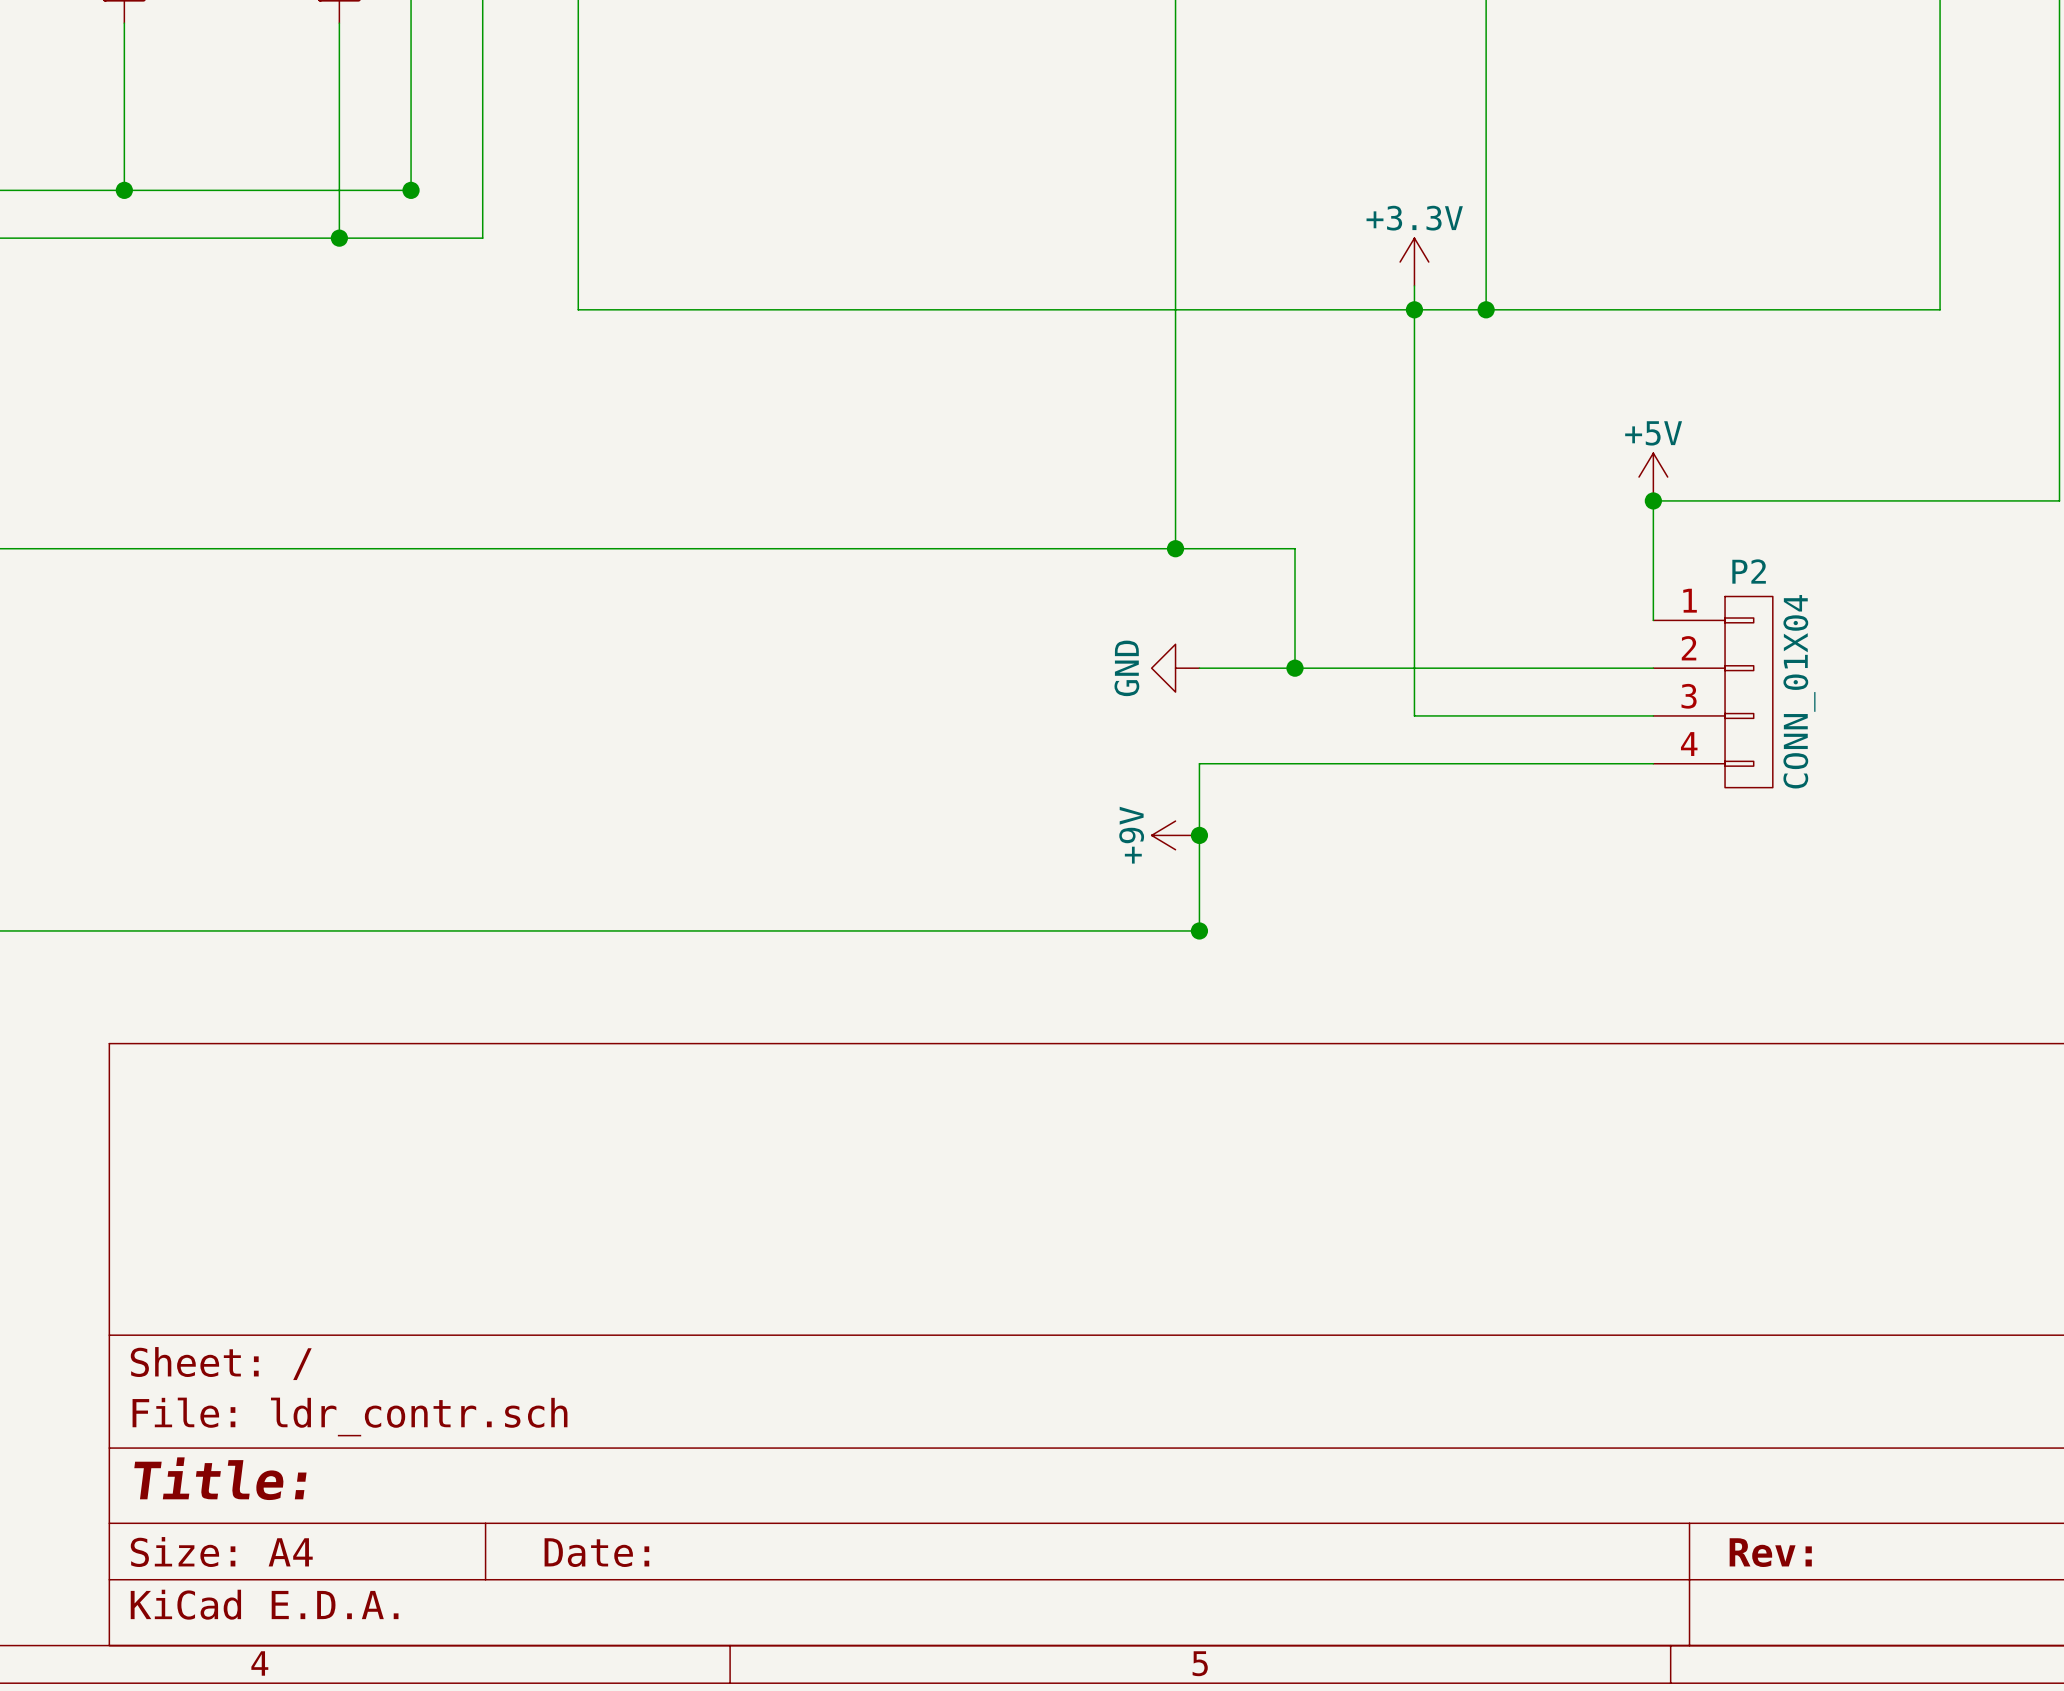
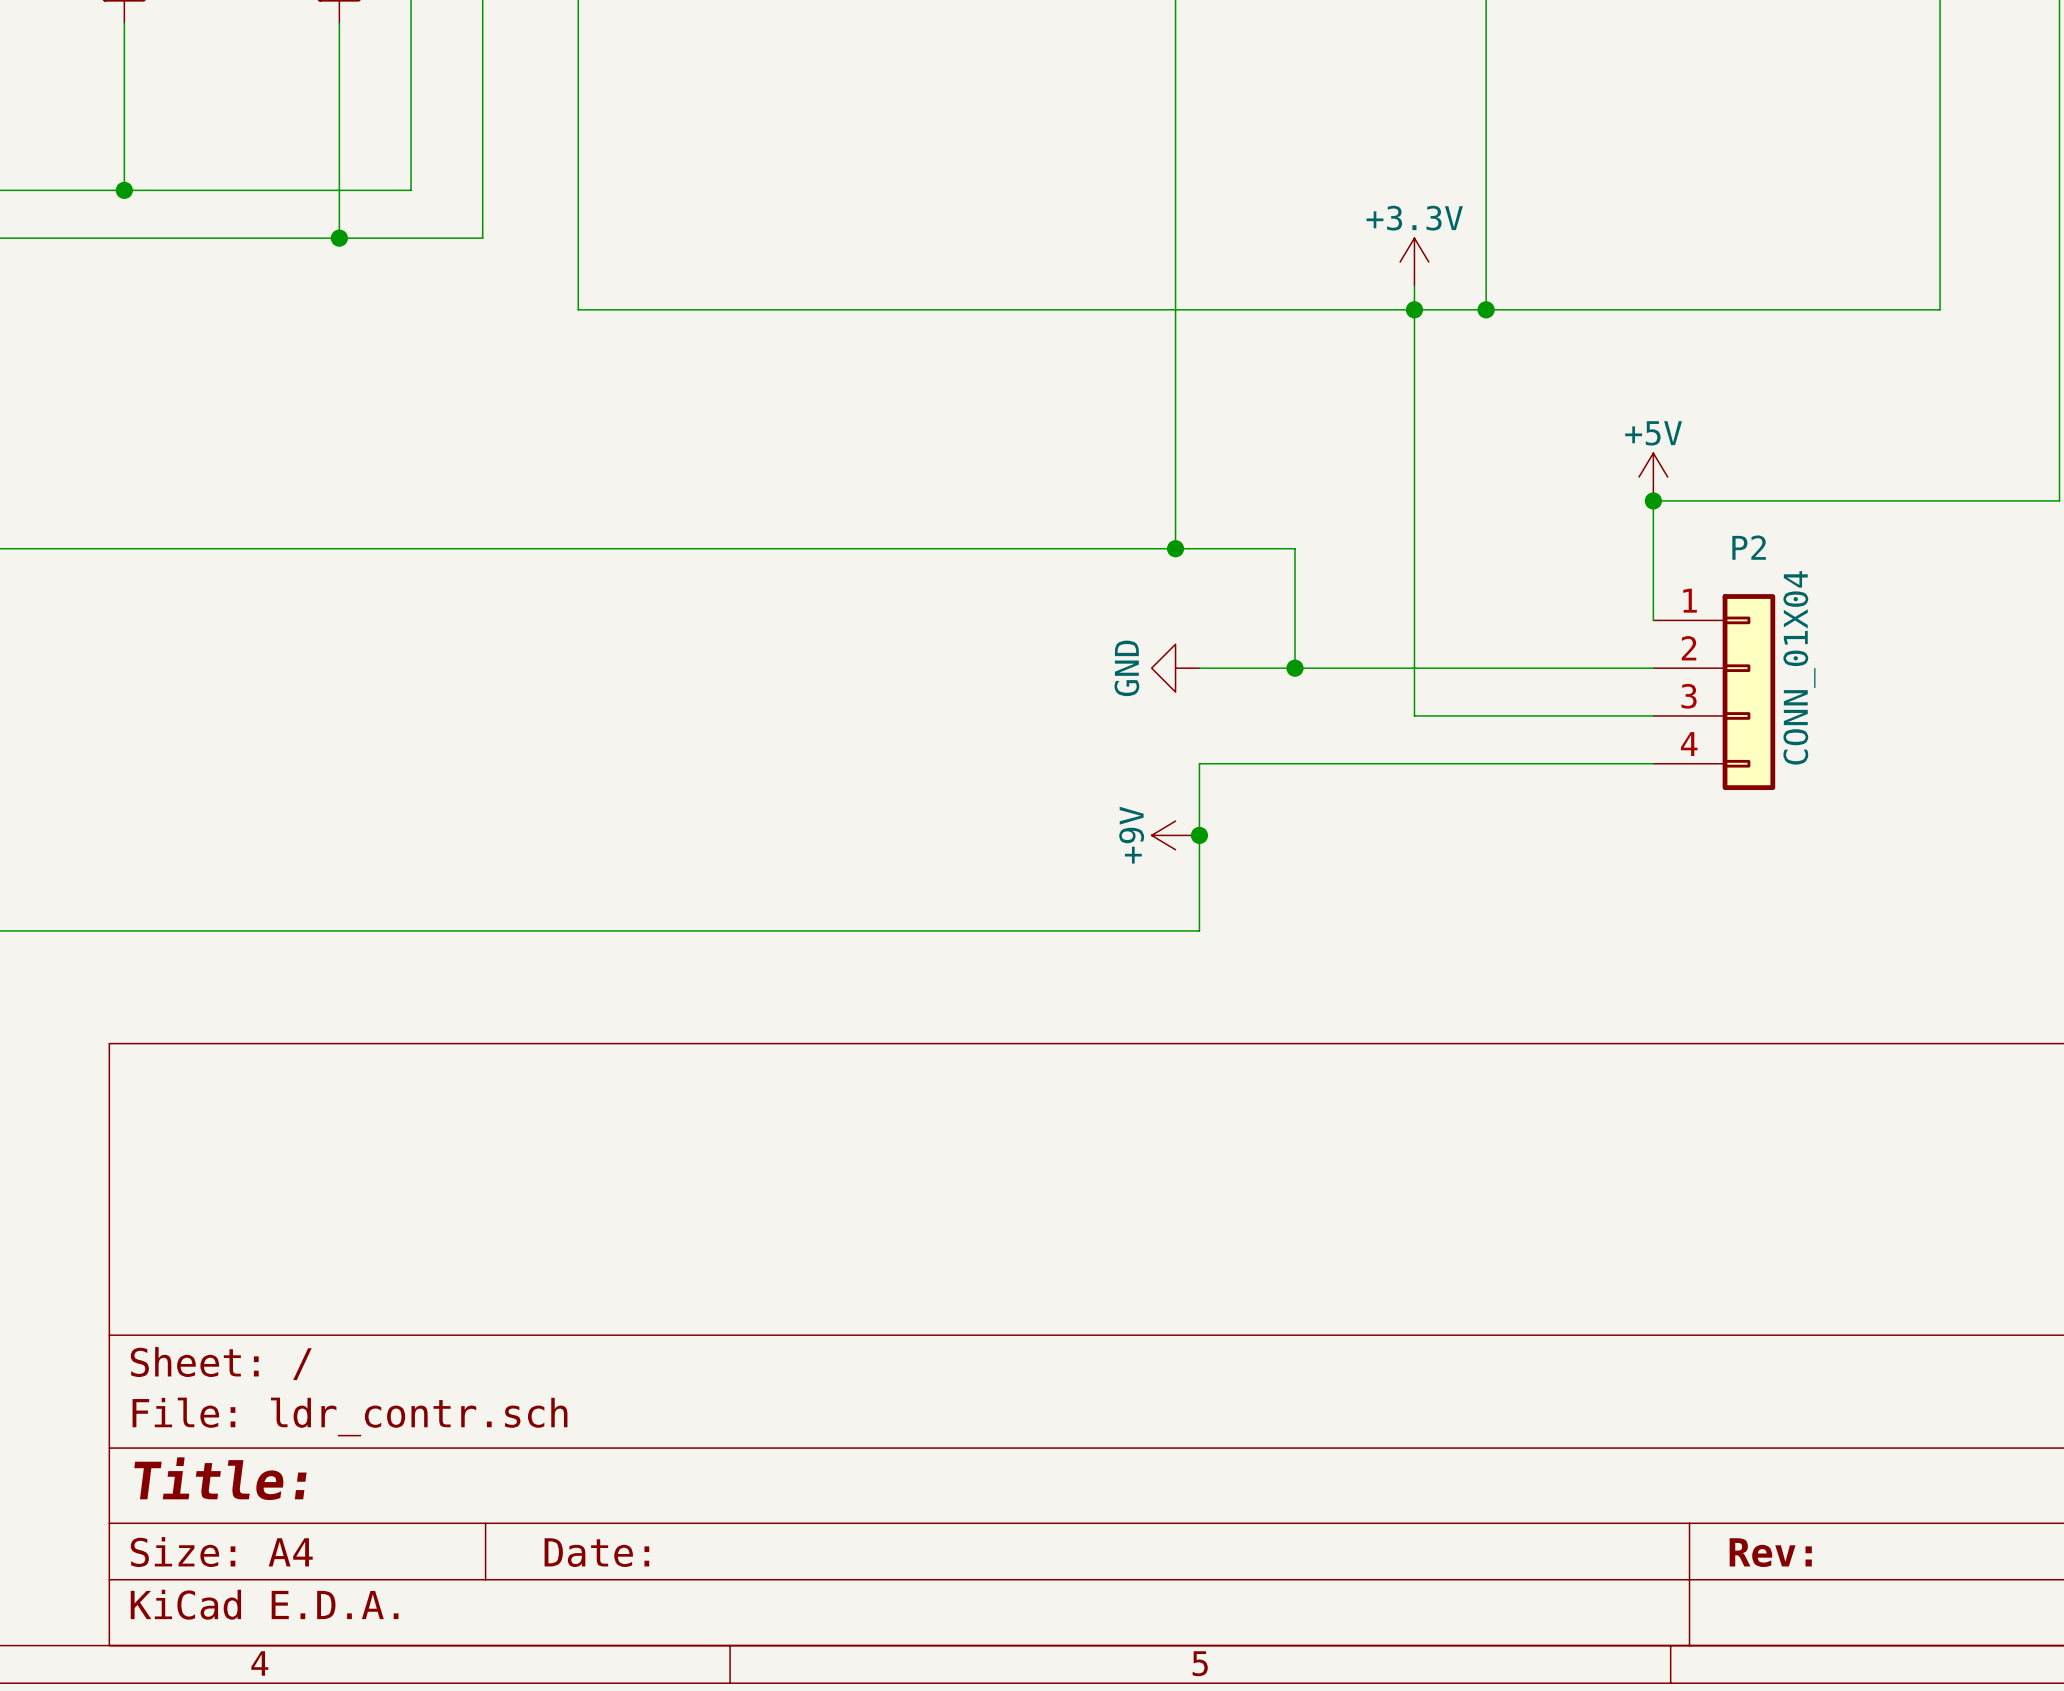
junction: (411, 190) -> none
P2 symbol: [1653, 596, 1773, 788] -> [1653, 594, 1776, 791]
junction: (1199, 930) -> none

